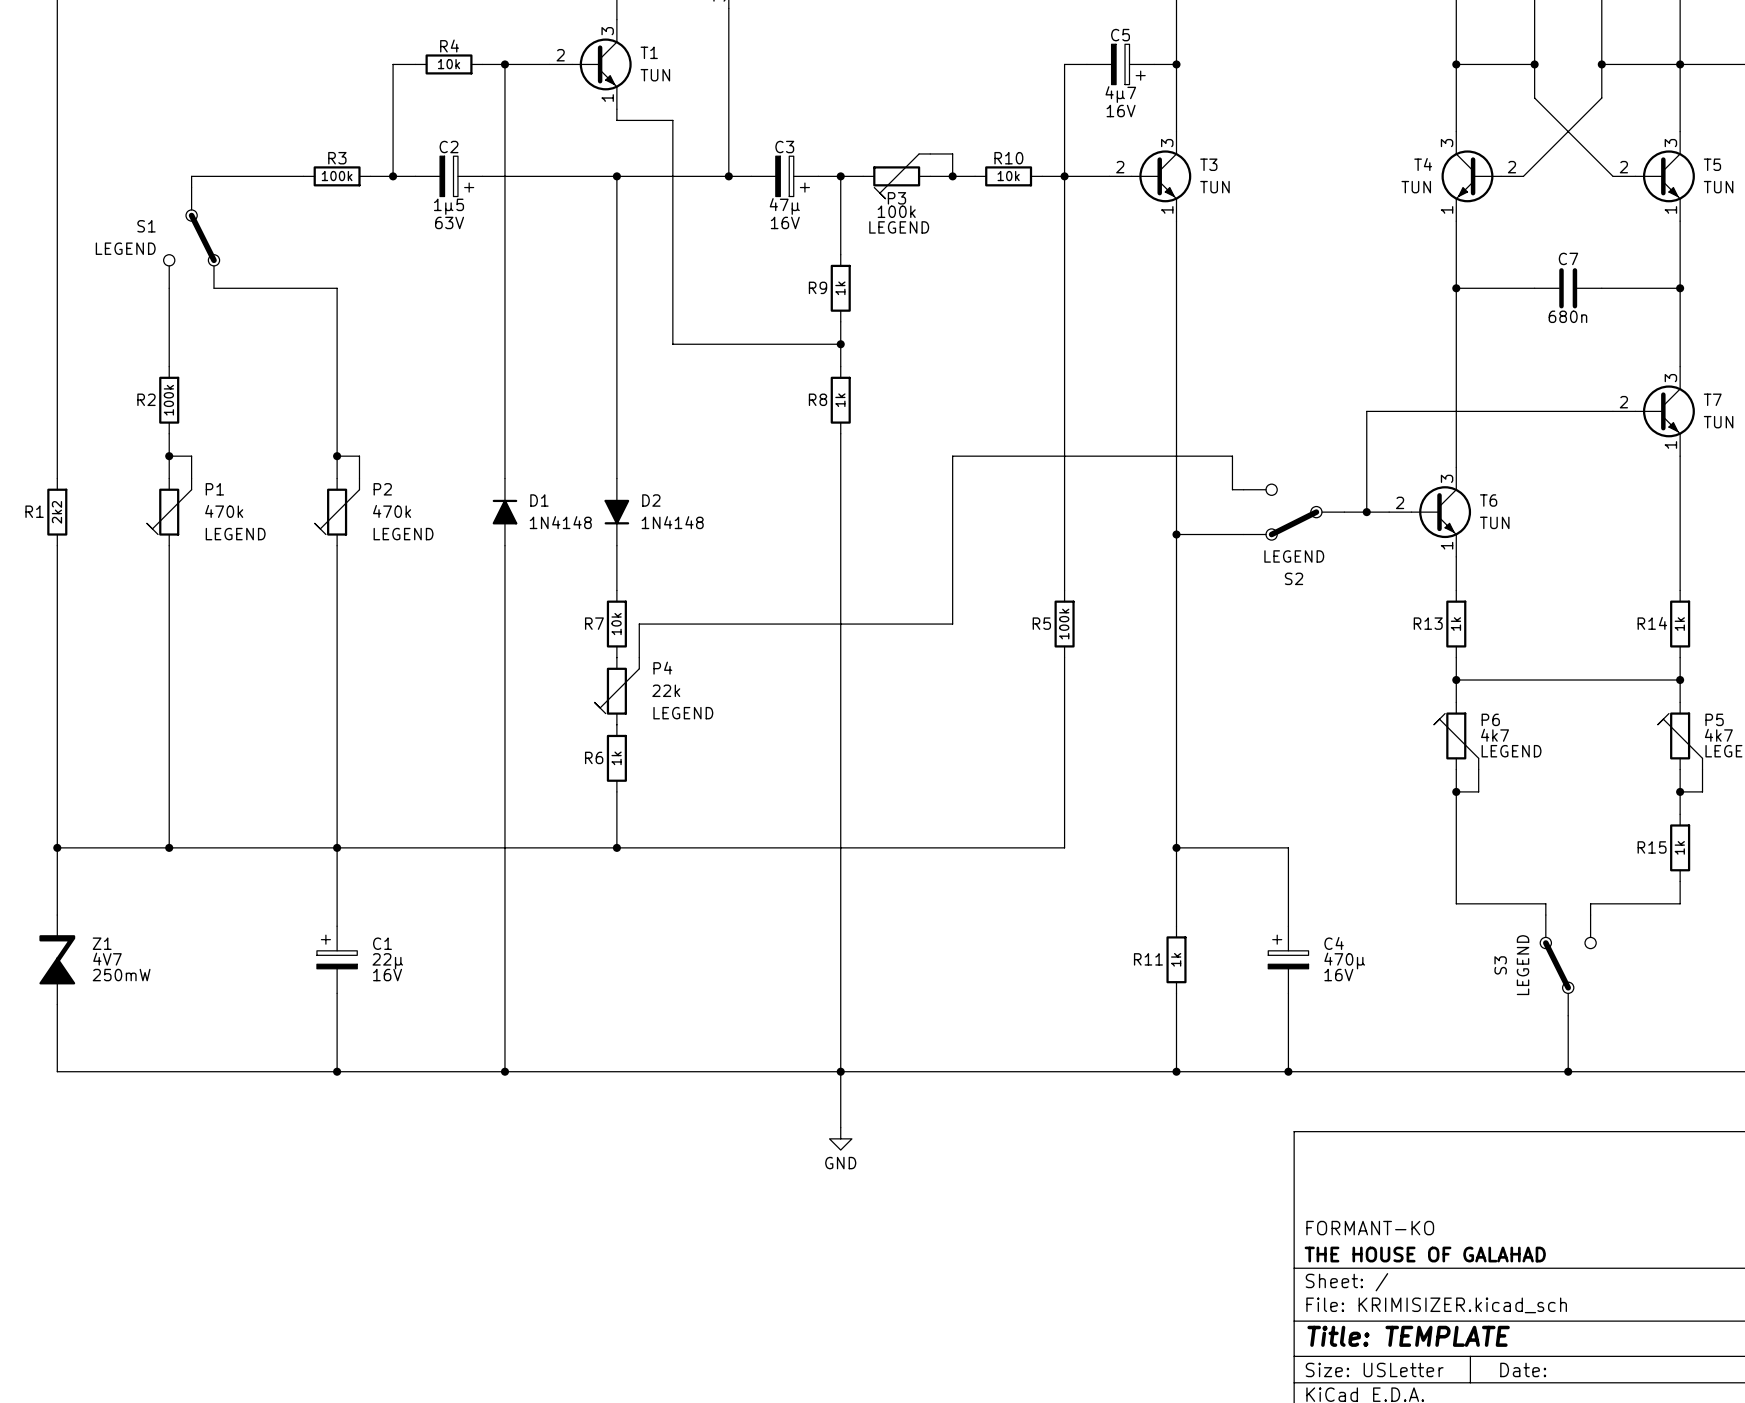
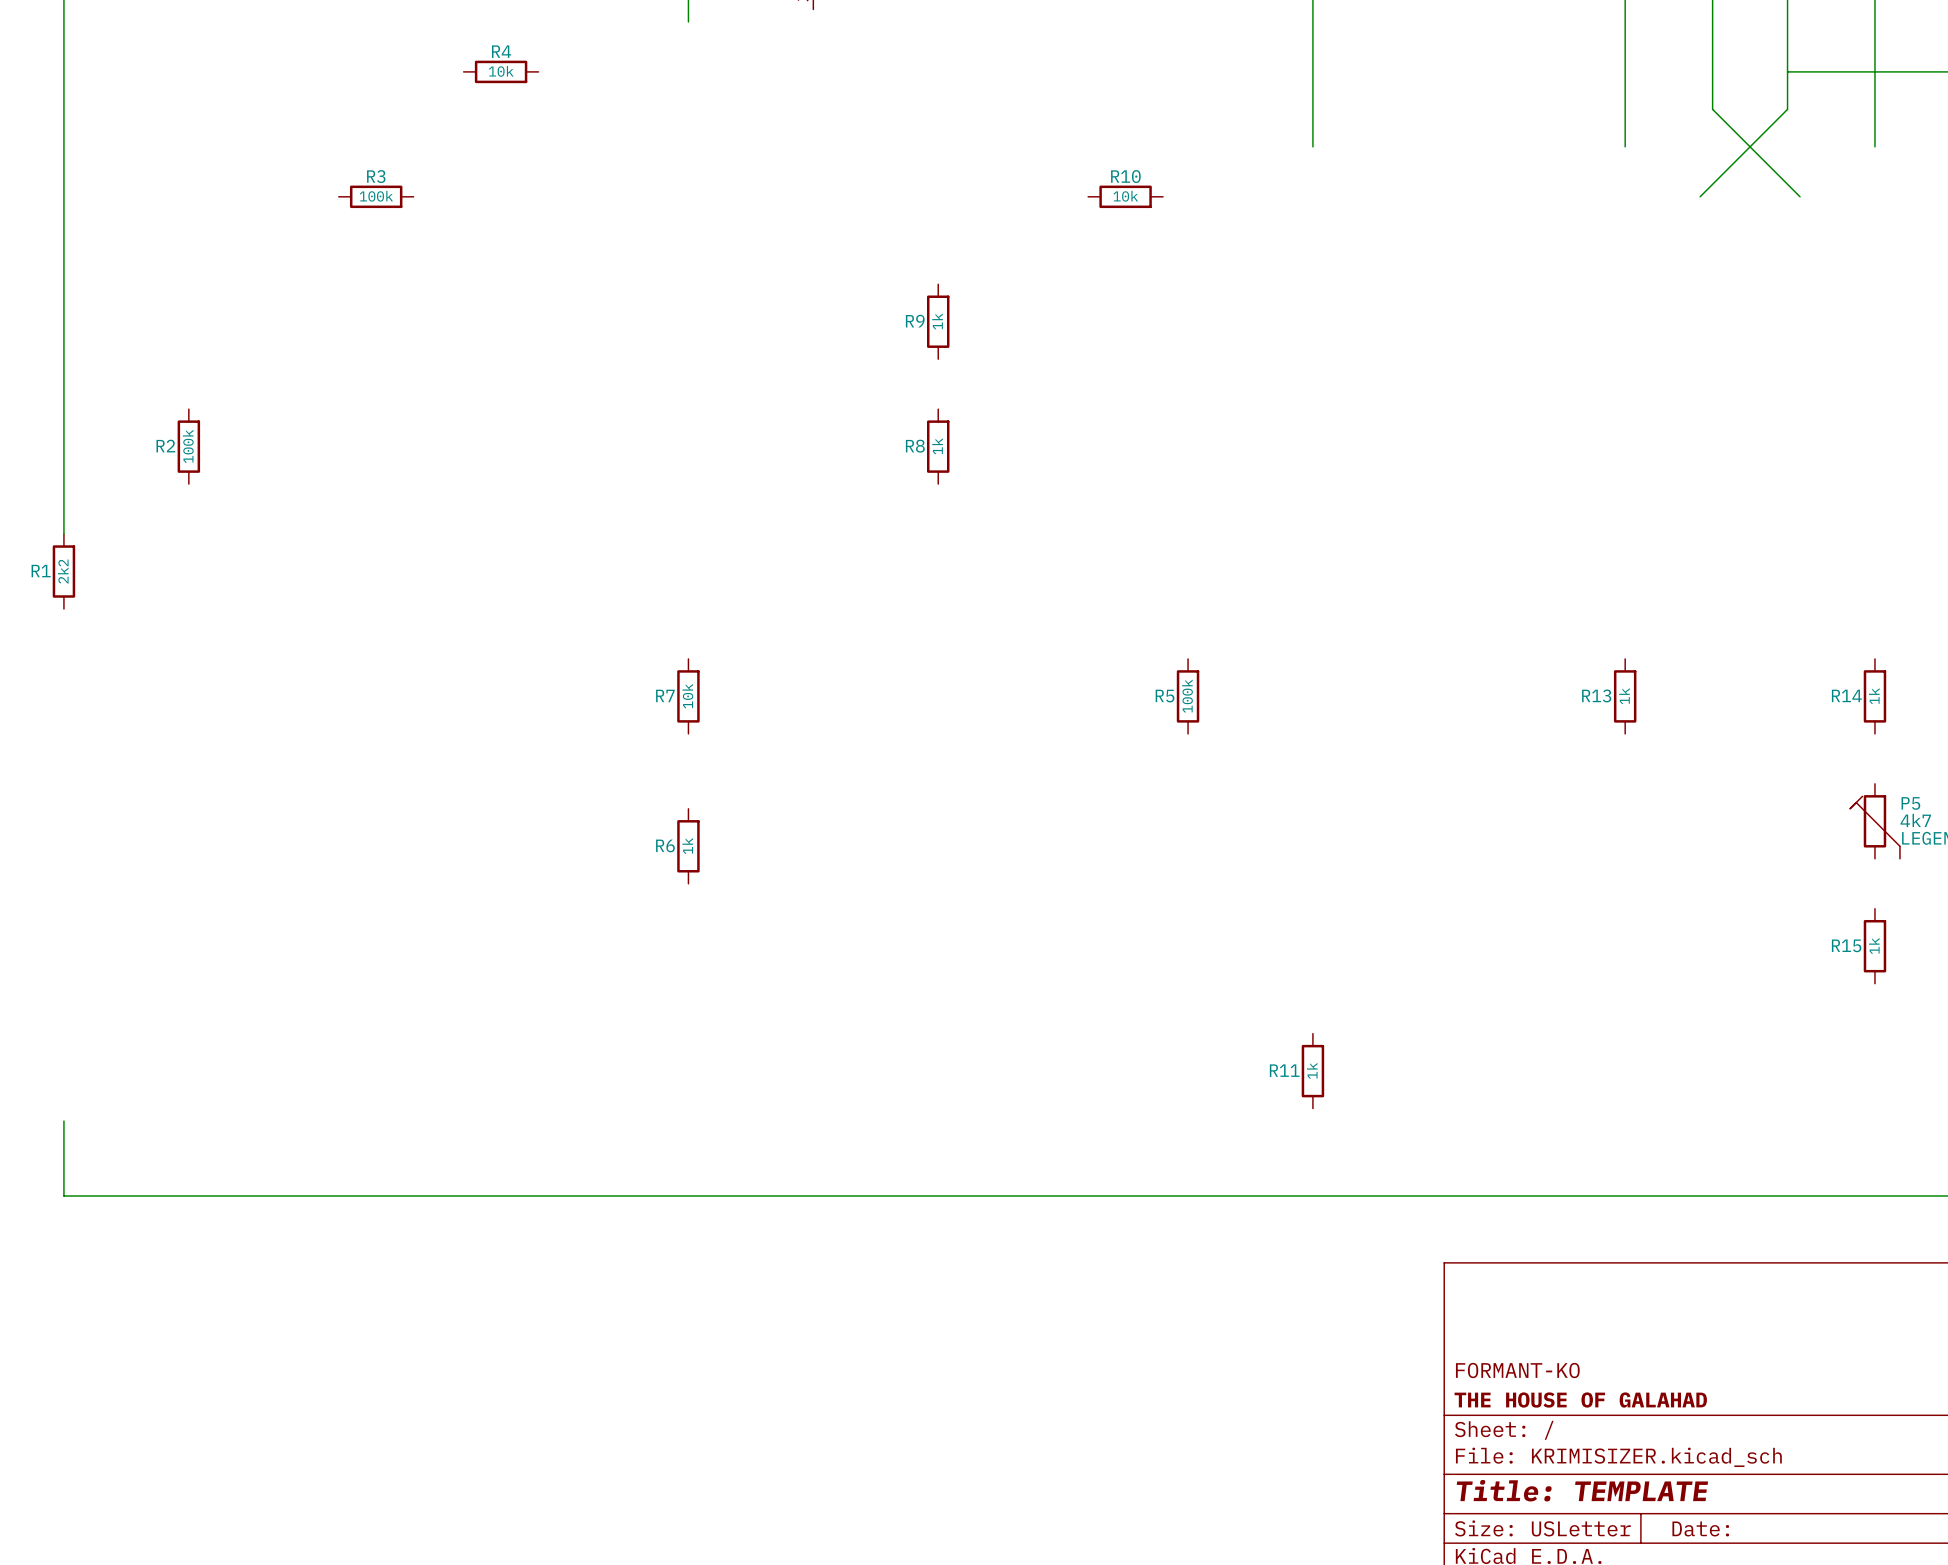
wire: (728, 8) (728, 176) -> none
wire: (415, 64) (393, 64) (393, 176) -> none
wire: (482, 64) (549, 64) -> none
wire: (504, 64) (504, 478) -> none
junction: (504, 64) -> none
T1: TUN (590, 64) -> none
wire: (1086, 64) (1064, 64) (1064, 590) -> none
C5: 4µ7 (1120, 64) -> none
wire: (1154, 64) (1176, 64) -> none
junction: (1176, 64) -> none
wire: (1456, 64) (1534, 64) -> none
junction: (1456, 64) -> none
junction: (1534, 64) -> none
junction: (1601, 64) -> none
junction: (1680, 64) -> none
wire: (616, 109) (616, 120) (672, 120) (672, 344) (840, 344) -> none
wire: (930, 153) (952, 153) (952, 176) -> none
wire: (303, 176) (191, 176) (191, 187) -> none
wire: (370, 176) (415, 176) -> none
junction: (393, 176) -> none
C2: 1µ5 (449, 176) -> none
wire: (482, 176) (751, 176) -> none
wire: (616, 176) (616, 478) -> none
junction: (616, 176) -> none
junction: (728, 176) -> none
C3: 47µ (784, 176) -> none
wire: (818, 176) (863, 176) -> none
wire: (840, 176) (840, 254) -> none
junction: (840, 176) -> none
P3: 100k (896, 176) -> none
wire: (930, 176) (975, 176) -> none
junction: (952, 176) -> none
wire: (1042, 176) (1109, 176) -> none
junction: (1064, 176) -> none
T3: TUN (1150, 176) -> none
T4: TUN (1482, 176) -> none
T5: TUN (1653, 176) -> none
wire: (1176, 221) (1176, 926) -> none
wire: (1456, 221) (1456, 467) -> none
wire: (1680, 221) (1680, 366) -> none
S1: (191, 237) -> none
wire: (169, 288) (169, 366) -> none
wire: (213, 288) (337, 288) (337, 478) -> none
wire: (1456, 288) (1534, 288) -> none
junction: (1456, 288) -> none
C7: 680n (1568, 288) -> none
wire: (1601, 288) (1680, 288) -> none
junction: (1680, 288) -> none
wire: (840, 321) (840, 366) -> none
junction: (840, 344) -> none
wire: (1612, 411) (1366, 411) (1366, 512) -> none
T7: TUN (1653, 411) -> none
wire: (169, 433) (169, 478) -> none
wire: (840, 433) (840, 1127) -> none
wire: (169, 456) (191, 456) (191, 478) -> none
junction: (169, 456) -> none
wire: (337, 456) (359, 456) (359, 478) -> none
junction: (337, 456) -> none
wire: (1680, 456) (1680, 590) -> none
wire: (1243, 489) (1232, 489) (1232, 456) (952, 456) (952, 624) (639, 624) (639, 657) -> none
P1: 470k (169, 512) -> none
P2: 470k (337, 512) -> none
D1: 1N4148 (504, 512) -> none
D2: 1N4148 (616, 512) -> none
S2: (1294, 512) -> none
wire: (1344, 512) (1389, 512) -> none
junction: (1366, 512) -> none
T6: TUN (1430, 512) -> none
wire: (1176, 534) (1243, 534) -> none
junction: (1176, 534) -> none
wire: (57, 545) (57, 915) -> none
wire: (169, 545) (169, 847) -> none
wire: (337, 545) (337, 926) -> none
wire: (504, 545) (504, 1071) -> none
wire: (616, 545) (616, 590) -> none
wire: (1456, 556) (1456, 590) -> none
wire: (1064, 657) (1064, 847) (57, 847) -> none
wire: (1456, 657) (1456, 702) -> none
wire: (1680, 657) (1680, 702) -> none
wire: (1456, 680) (1680, 680) -> none
junction: (1456, 680) -> none
junction: (1680, 680) -> none
P4: 22k (616, 691) -> none
P6: 4k7 (1456, 735) -> none
wire: (1456, 769) (1456, 903) (1545, 903) (1545, 915) -> none
wire: (1478, 769) (1478, 791) (1456, 791) -> none
wire: (1680, 769) (1680, 814) -> none
wire: (1702, 769) (1702, 791) (1680, 791) -> none
wire: (616, 791) (616, 847) -> none
junction: (1456, 791) -> none
junction: (1680, 791) -> none
junction: (57, 847) -> none
junction: (169, 847) -> none
junction: (337, 847) -> none
junction: (616, 847) -> none
wire: (1176, 847) (1288, 847) (1288, 926) -> none
junction: (1176, 847) -> none
wire: (1680, 881) (1680, 903) (1590, 903) (1590, 915) -> none
Z1: 4V7 (57, 959) -> none
C1: 22µ (337, 959) -> none
C4: 470µ (1288, 959) -> none
S3: (1568, 965) -> none
wire: (337, 993) (337, 1071) -> none
wire: (1176, 993) (1176, 1071) -> none
wire: (1288, 993) (1288, 1071) -> none
wire: (1568, 1015) (1568, 1071) -> none
junction: (337, 1071) -> none
junction: (504, 1071) -> none
junction: (840, 1071) -> none
junction: (1176, 1071) -> none
junction: (1288, 1071) -> none
junction: (1568, 1071) -> none
power symbol: GND (840, 1138) -> none

